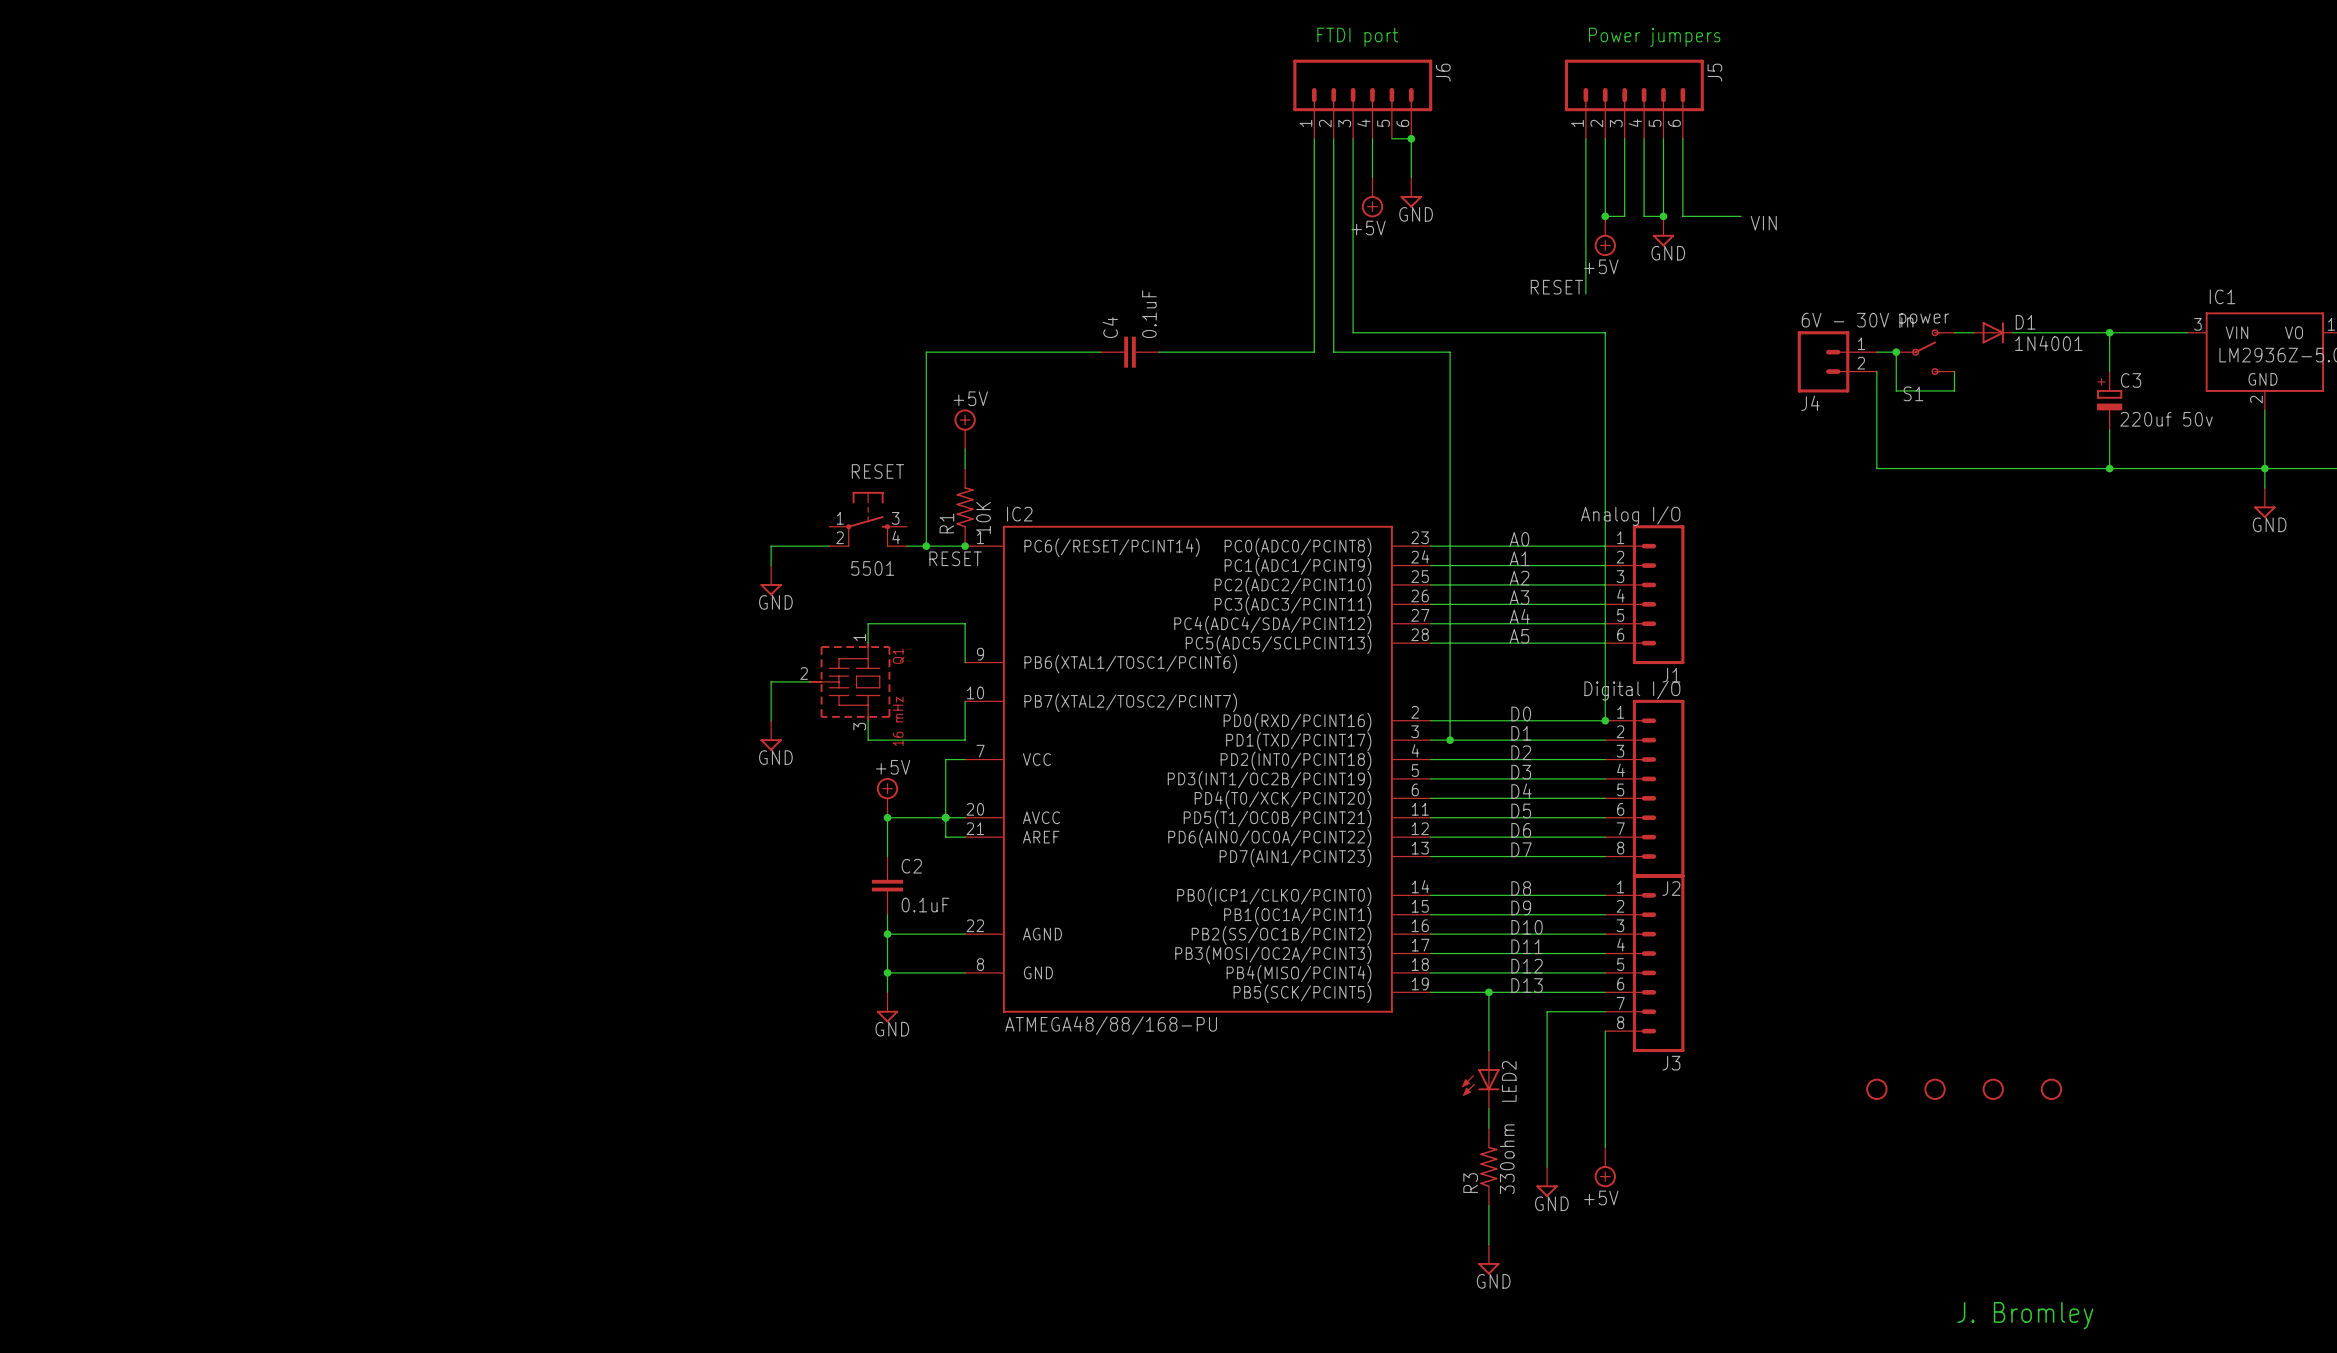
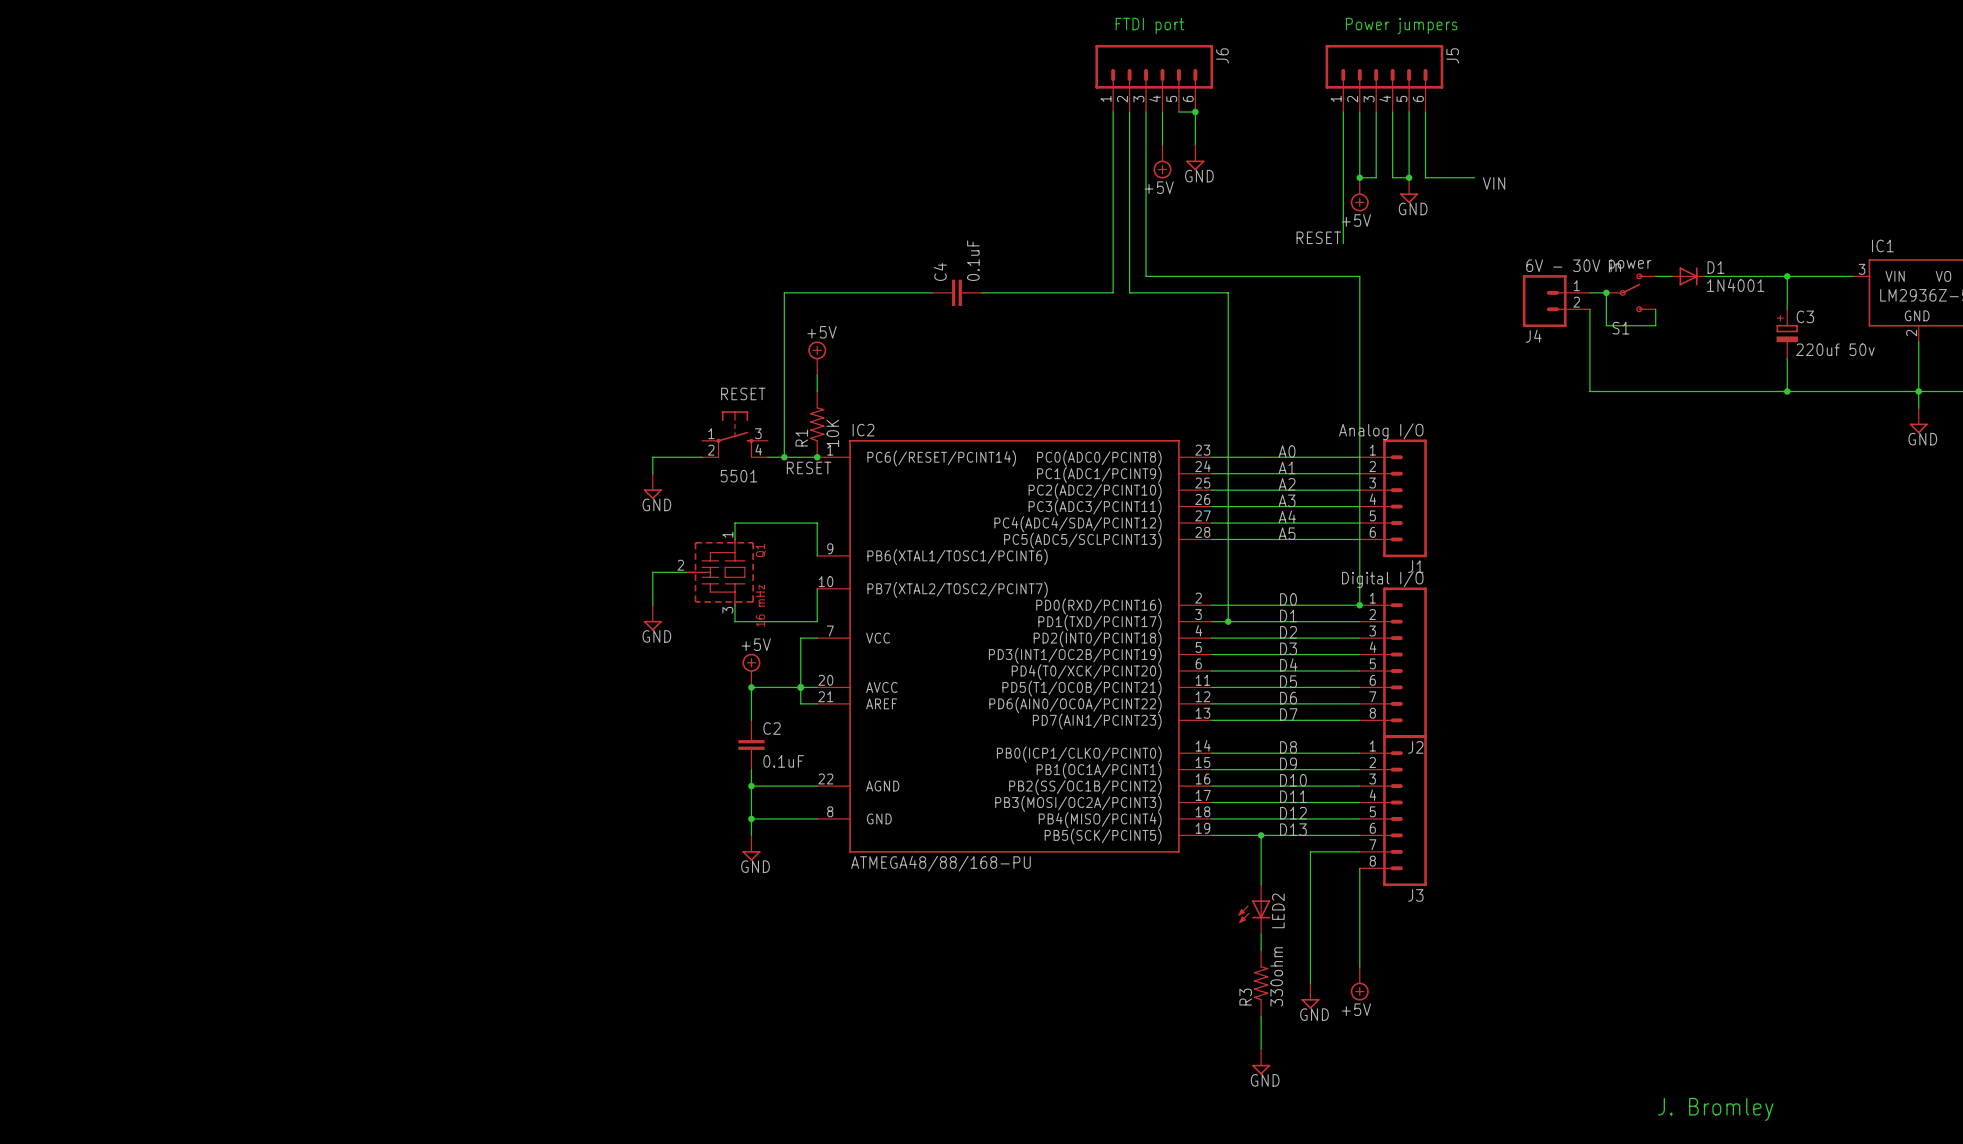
part: (1876, 1089) -> none
part: (1935, 1089) -> none
part: (1993, 1089) -> none
part: (2051, 1089) -> none

